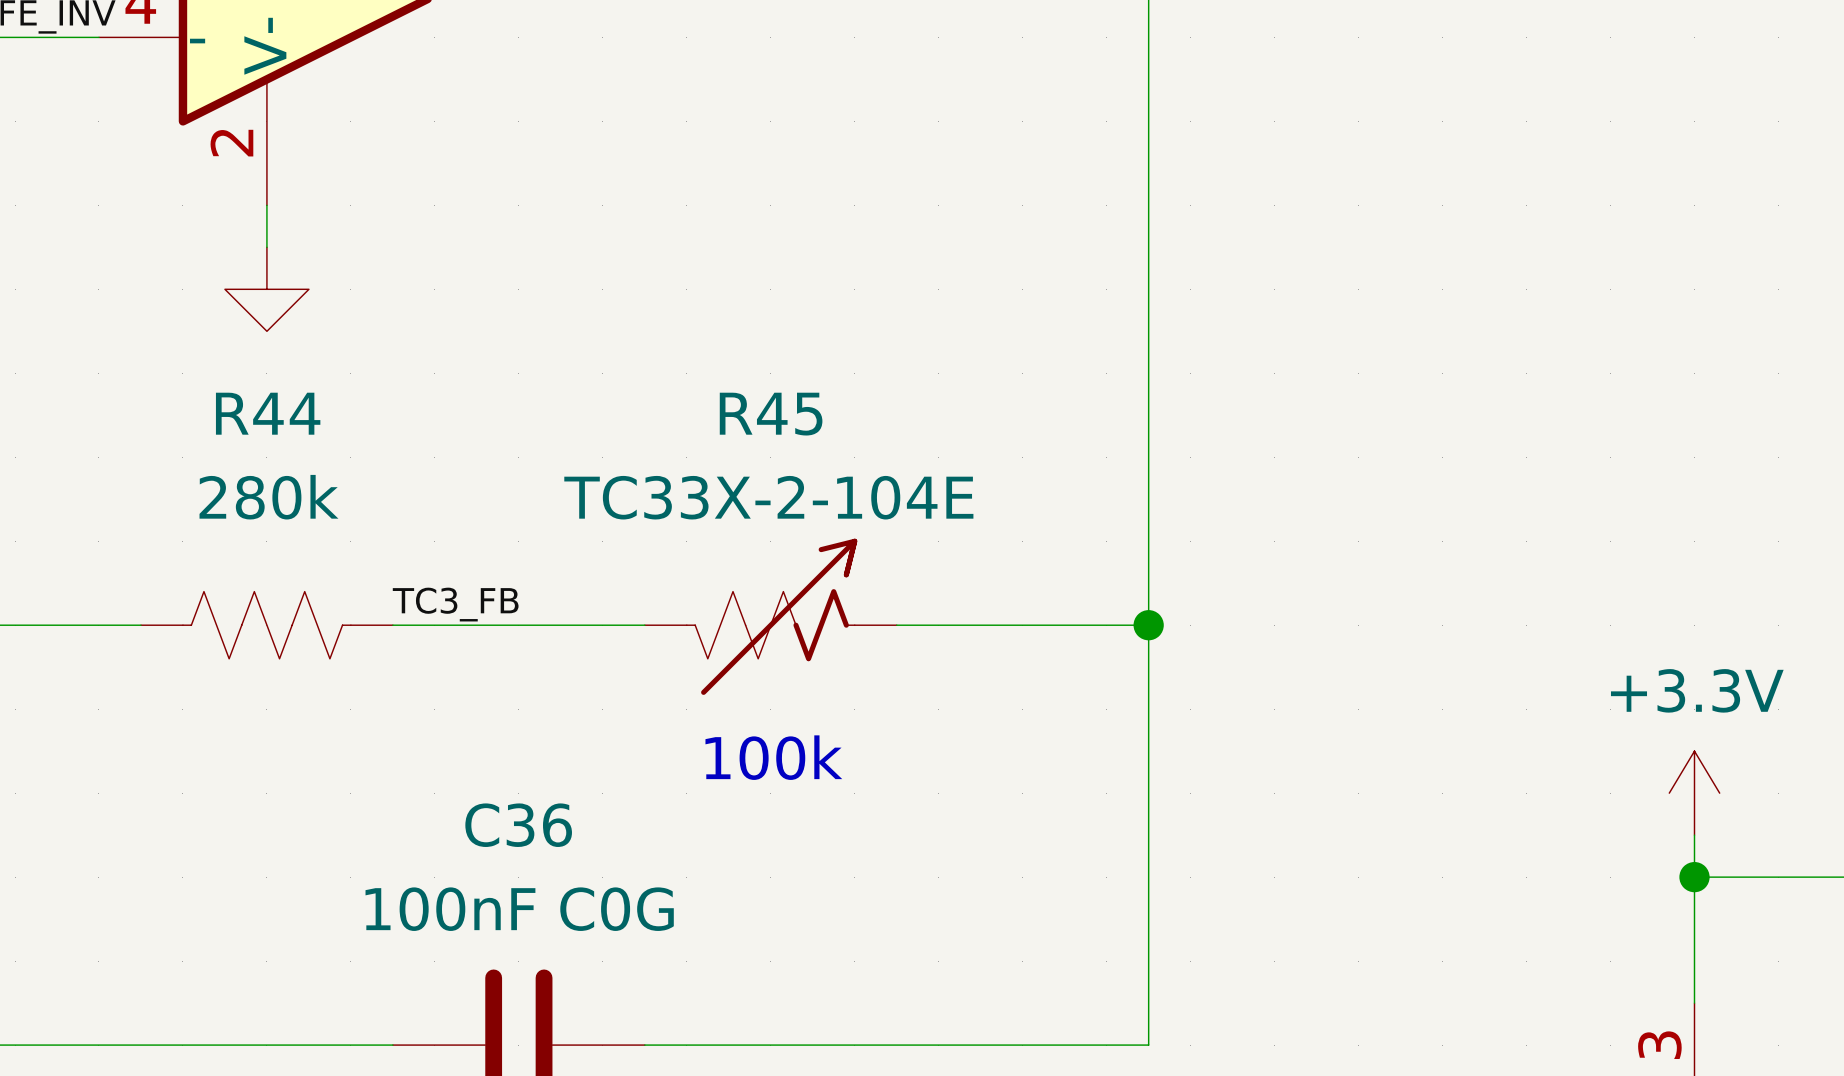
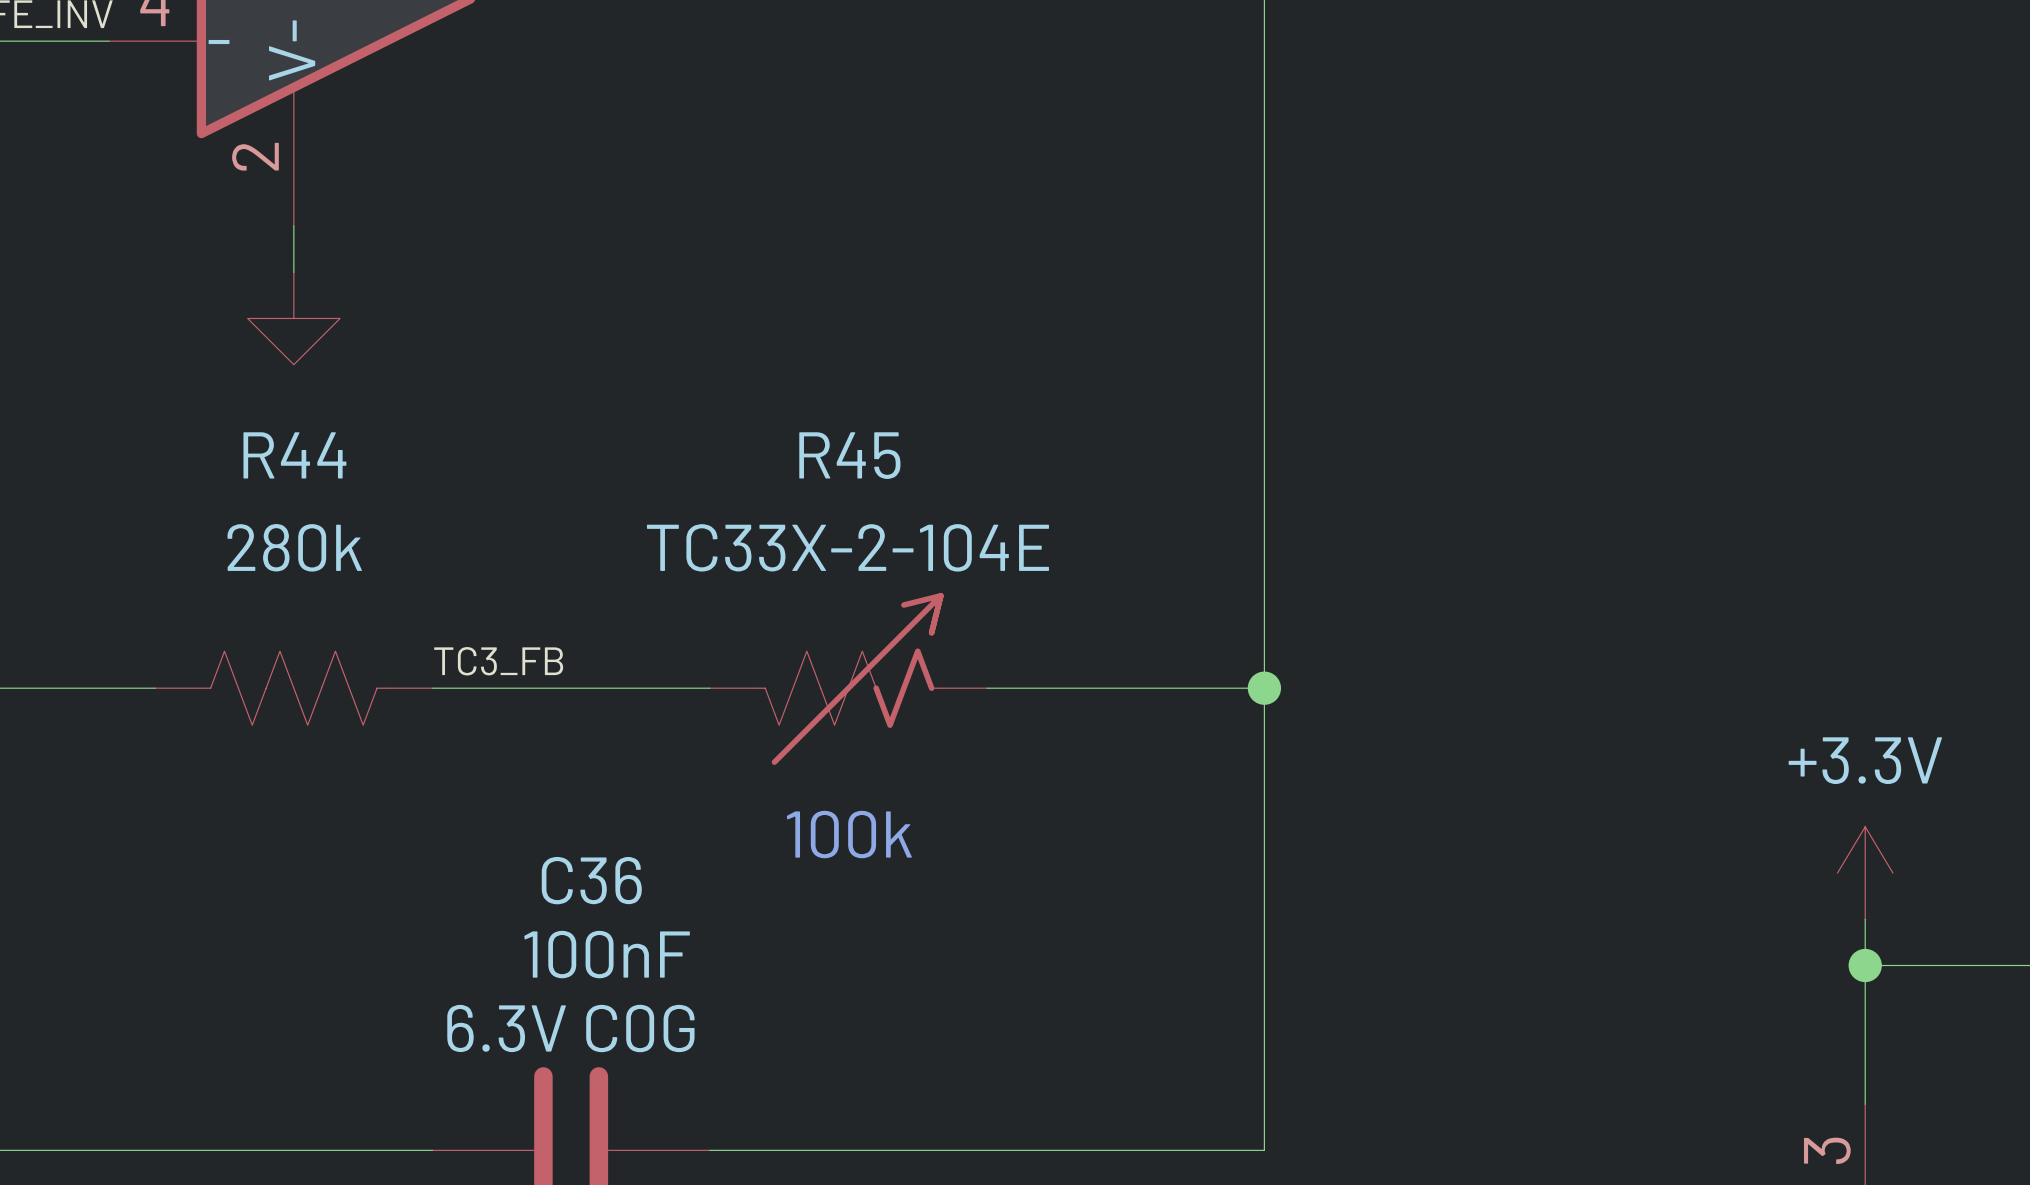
C36 name position: C36 (518, 825) -> C36 (591, 880)
C36 value: 100nF C0G (519, 909) -> 100nF (607, 954)
C36 text: none -> 6.3V C0G (570, 1028)

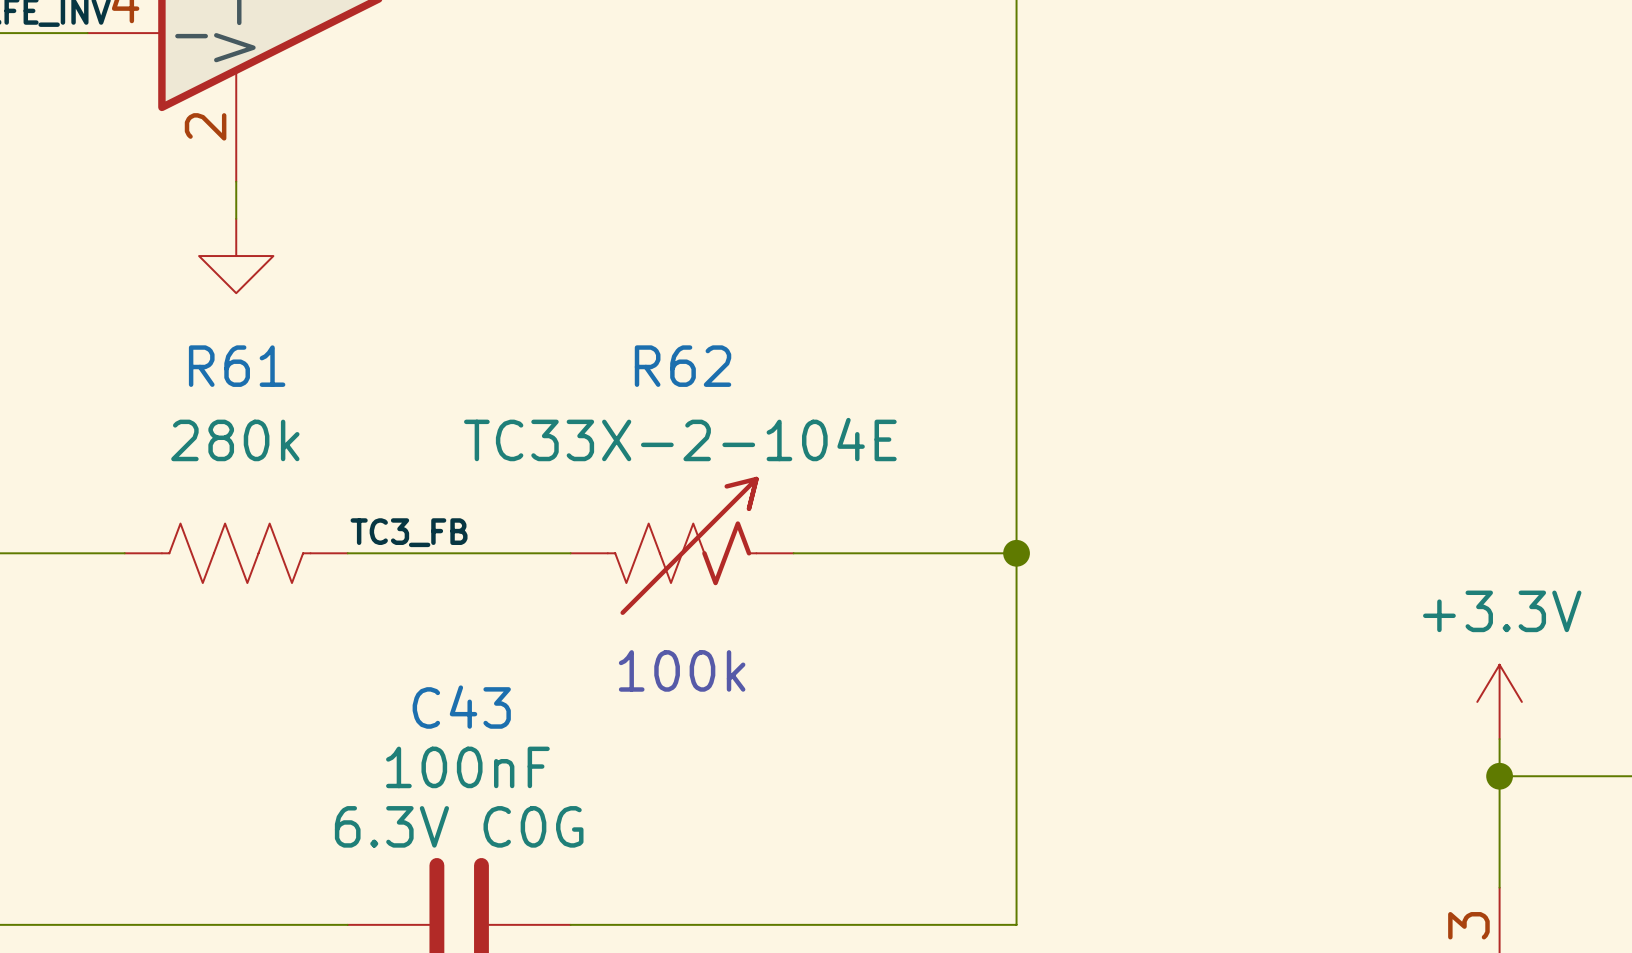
R44 name: R44 (294, 455) -> R61 (237, 366)
R45 name: R45 (849, 455) -> R62 (683, 366)
C36 name: C36 (591, 880) -> C43 (461, 707)

